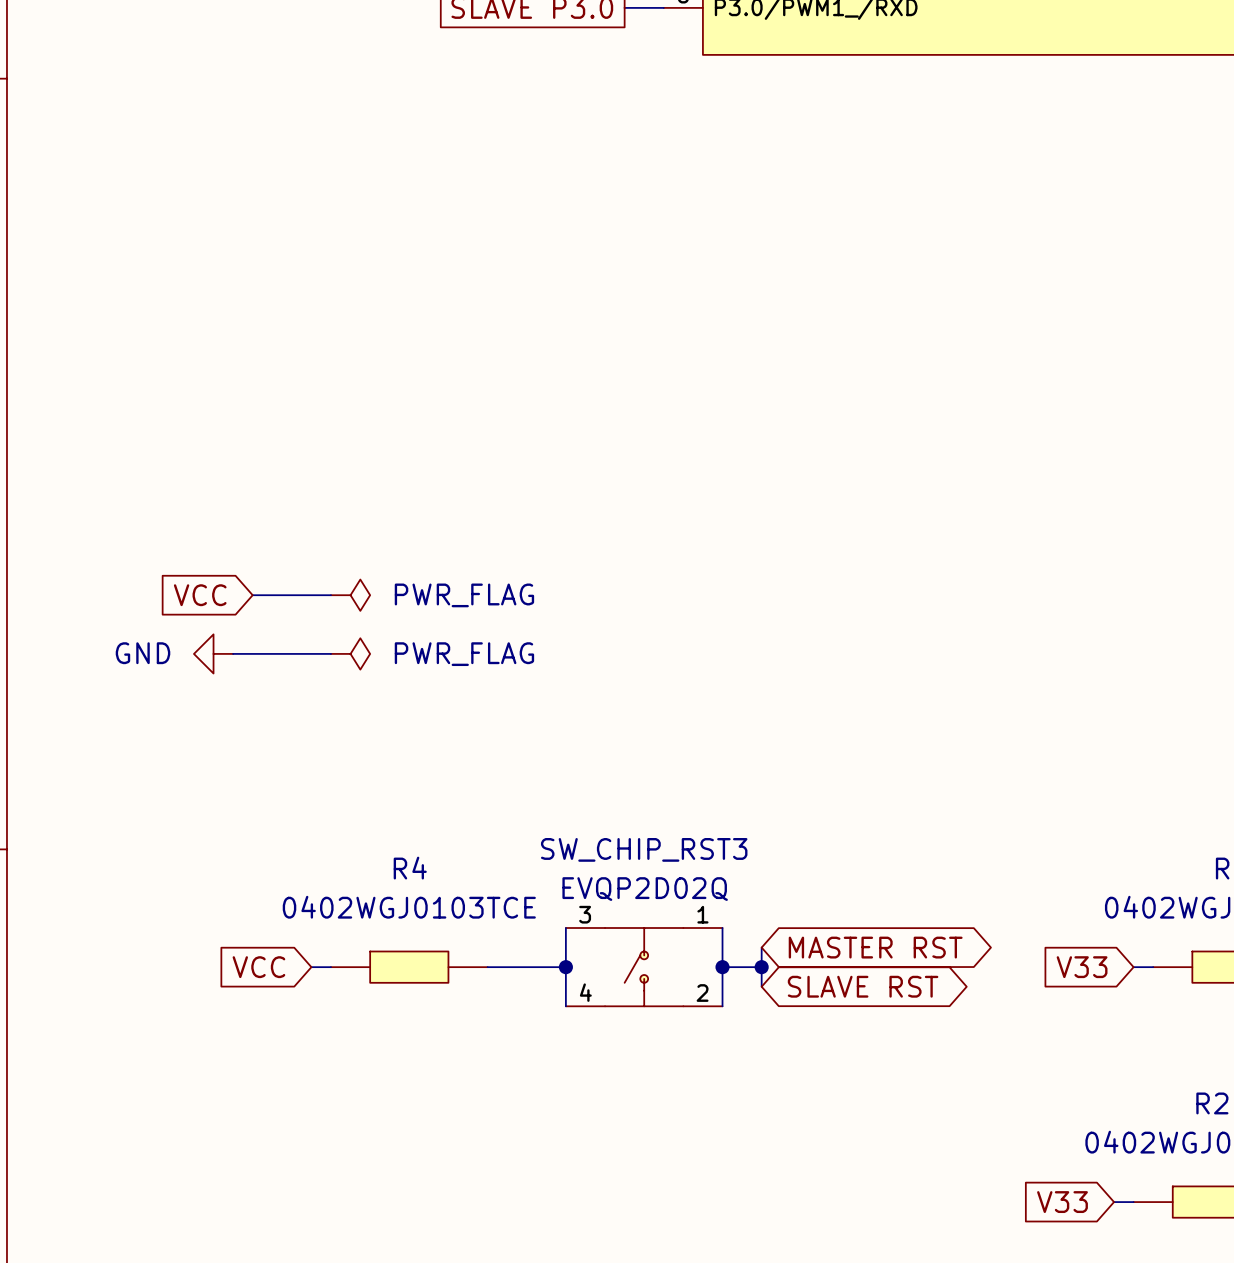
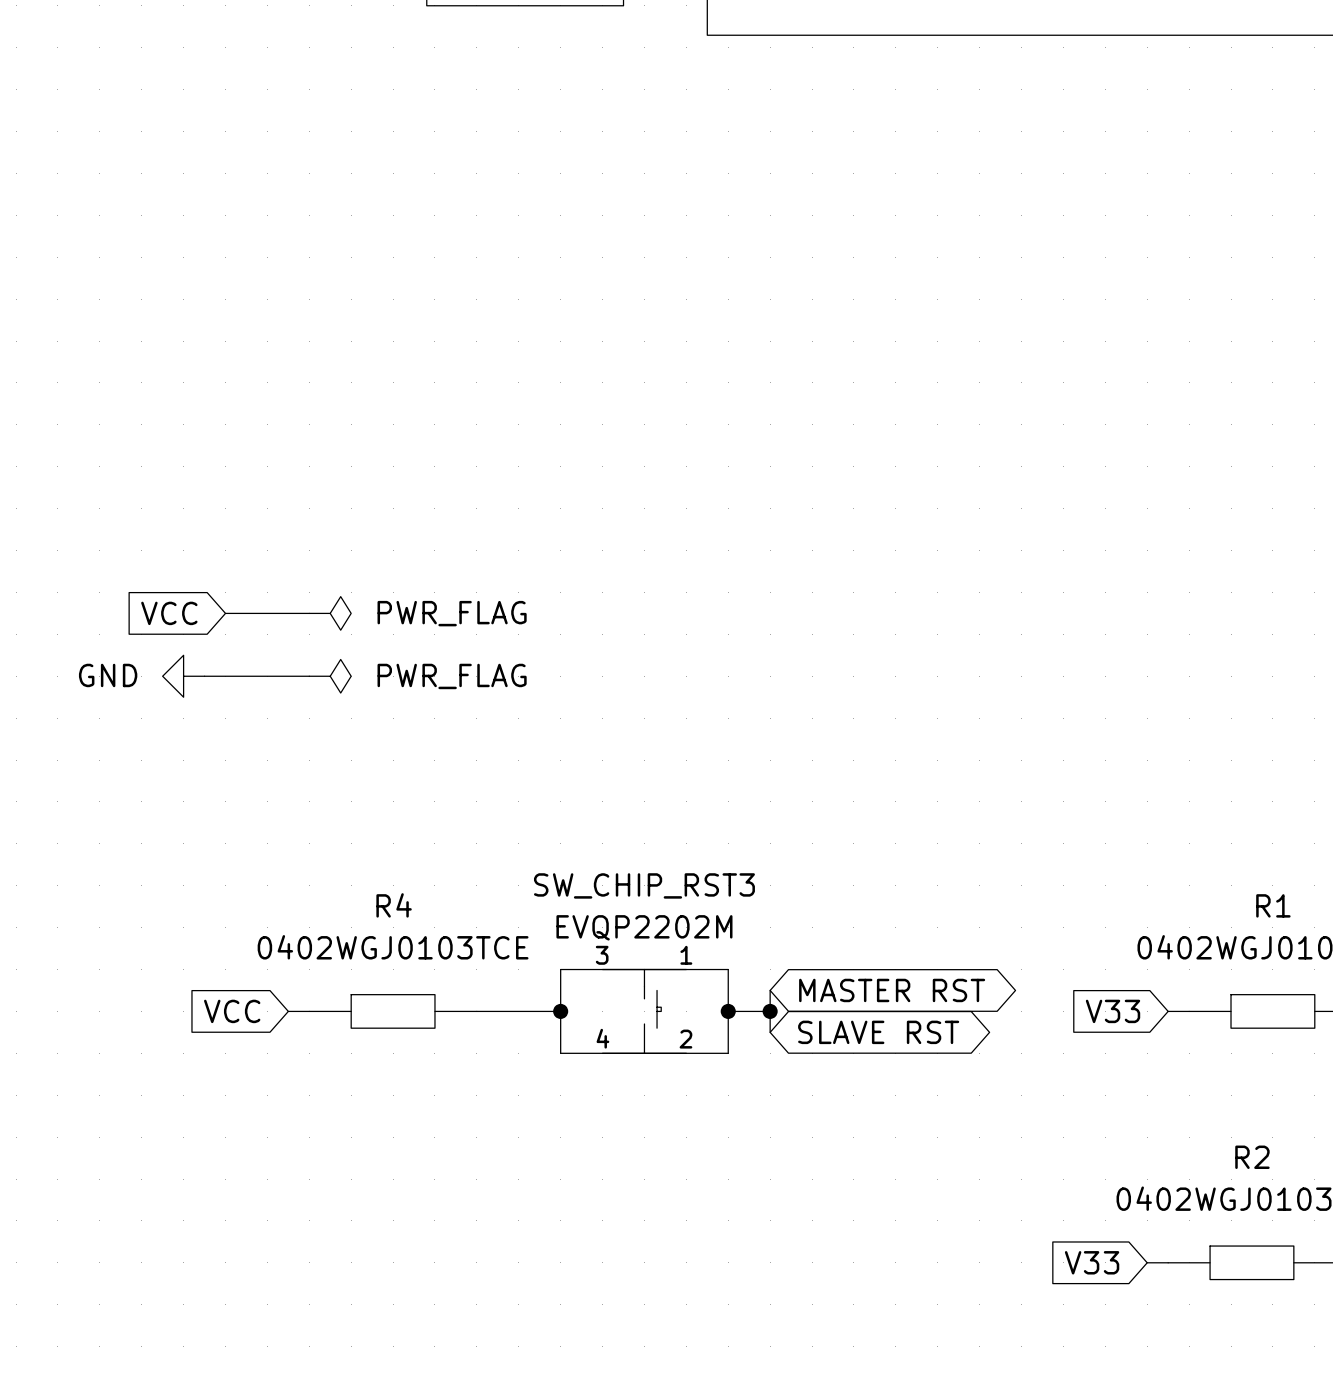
SW_CHIP_RST3 value: EVQP2D02Q (645, 889) -> EVQP2202M (644, 927)
SW_CHIP_RST3 symbol: [565, 928, 723, 1007] -> [560, 969, 729, 1054]

